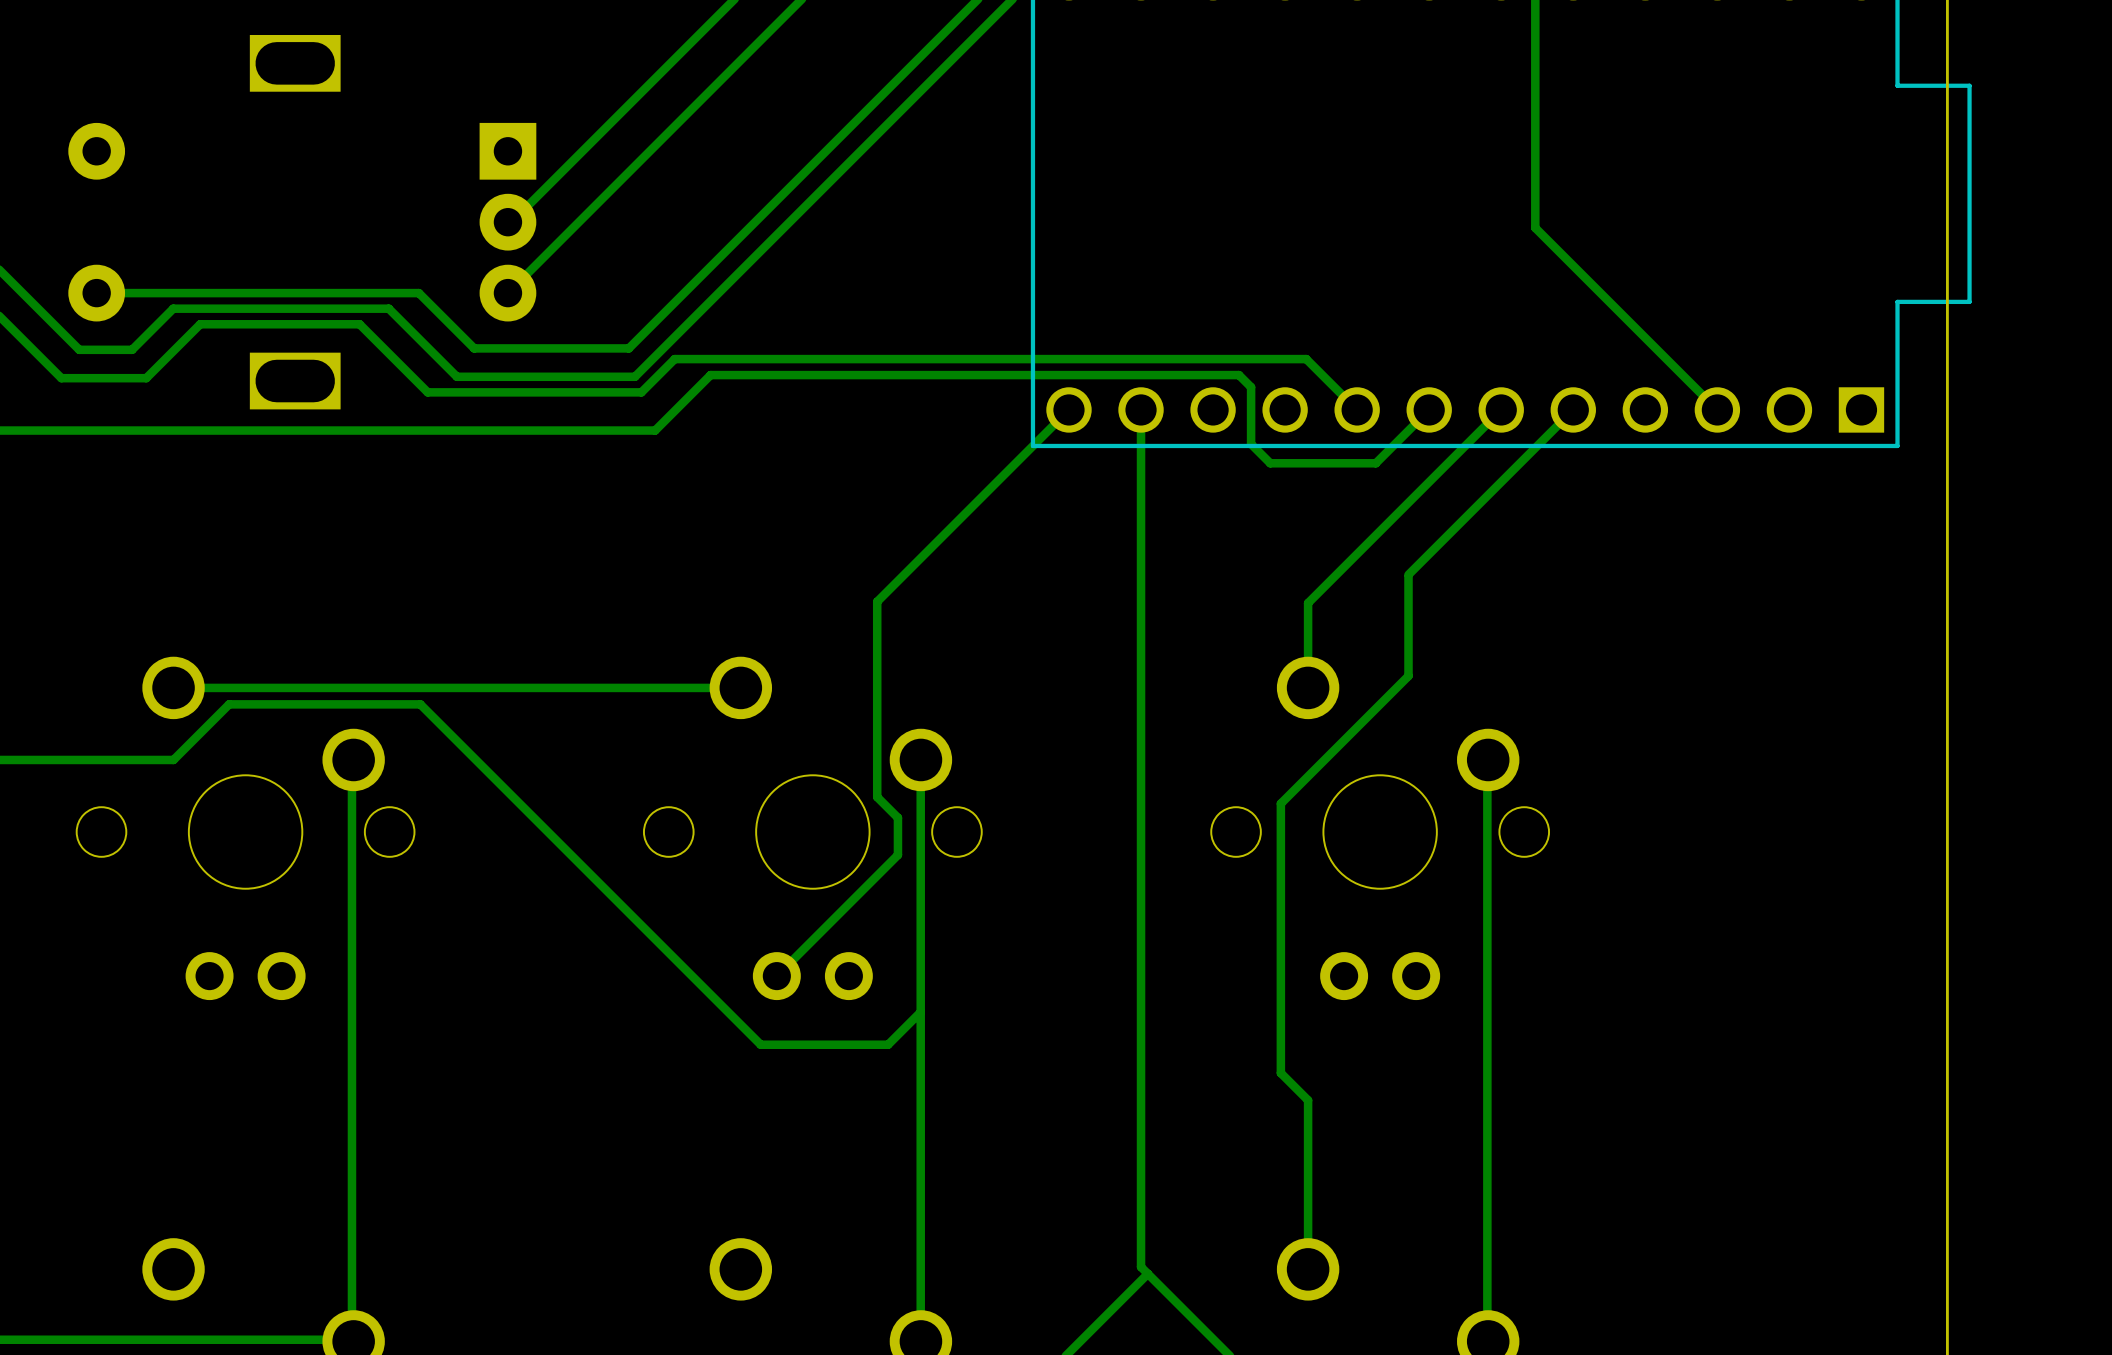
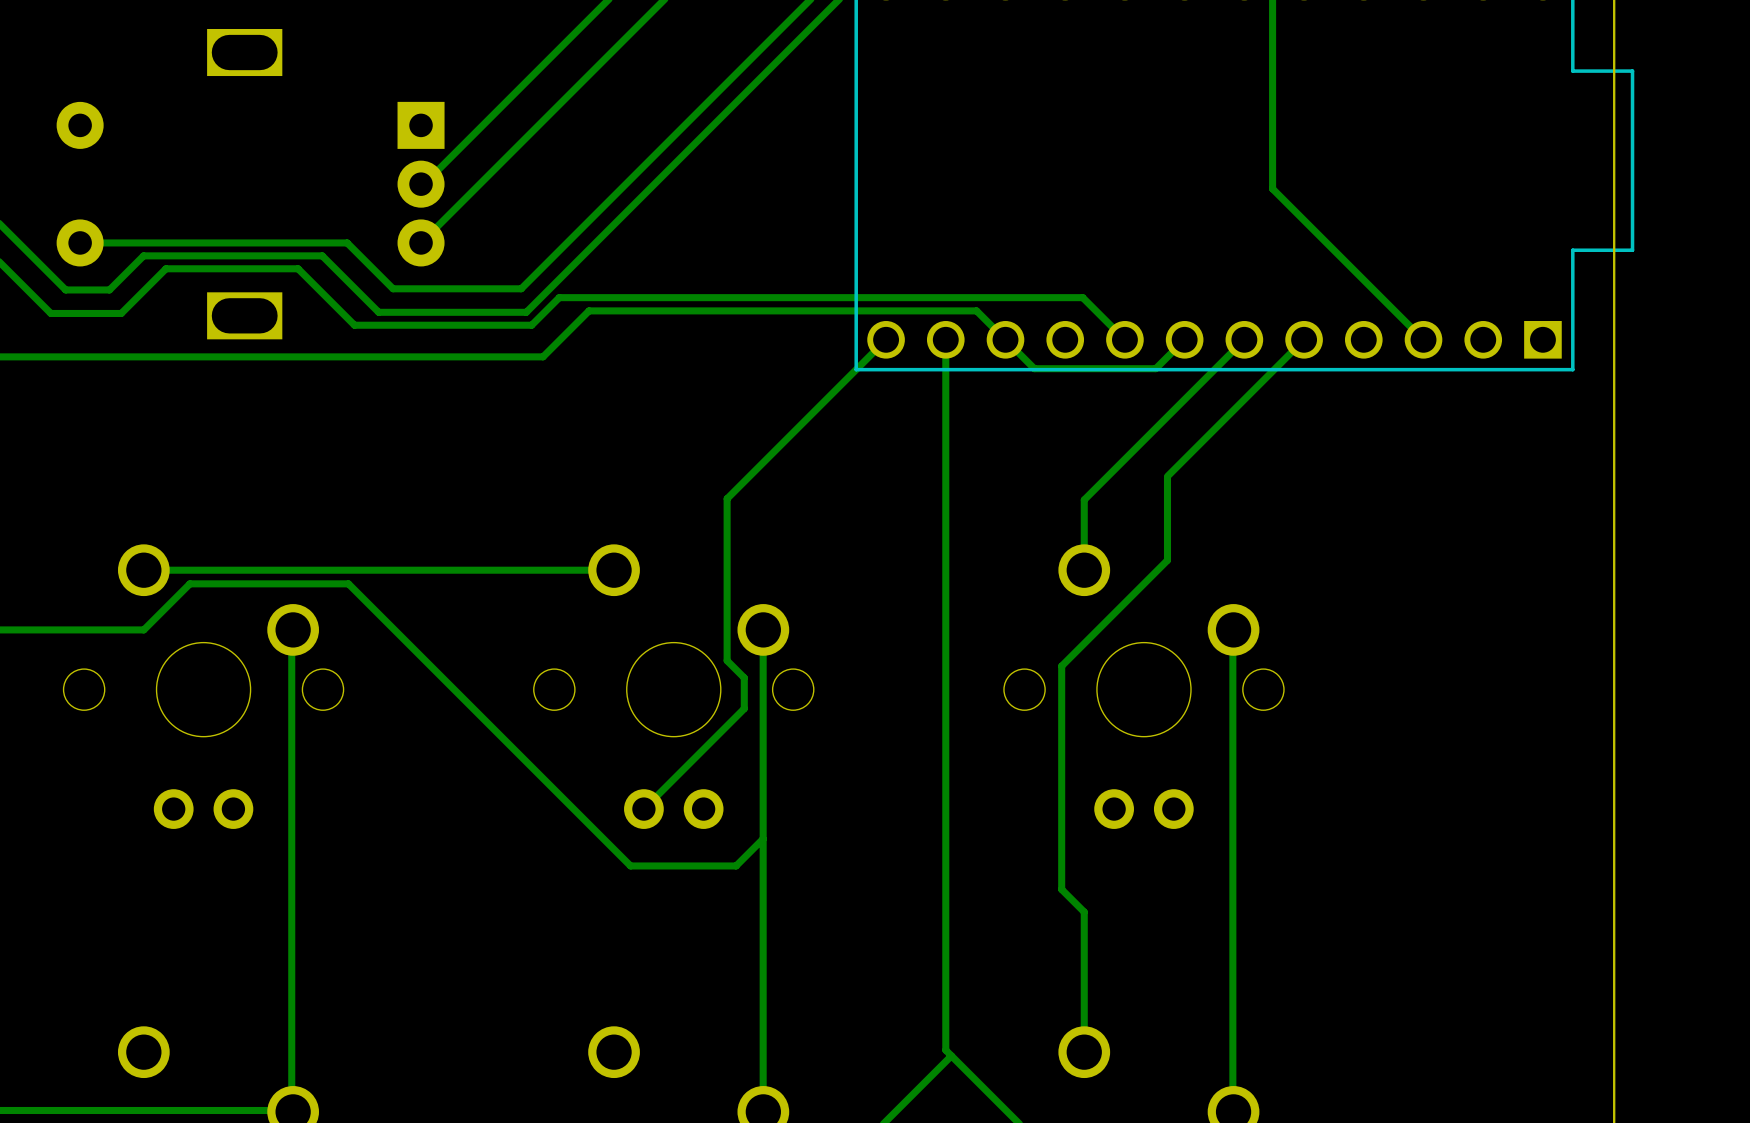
track: (1178, 375) (1238, 375) (1251, 387) (1251, 444) (1270, 463) (1375, 463) (1394, 444) -> (976, 310) (1034, 368) (1155, 368)

